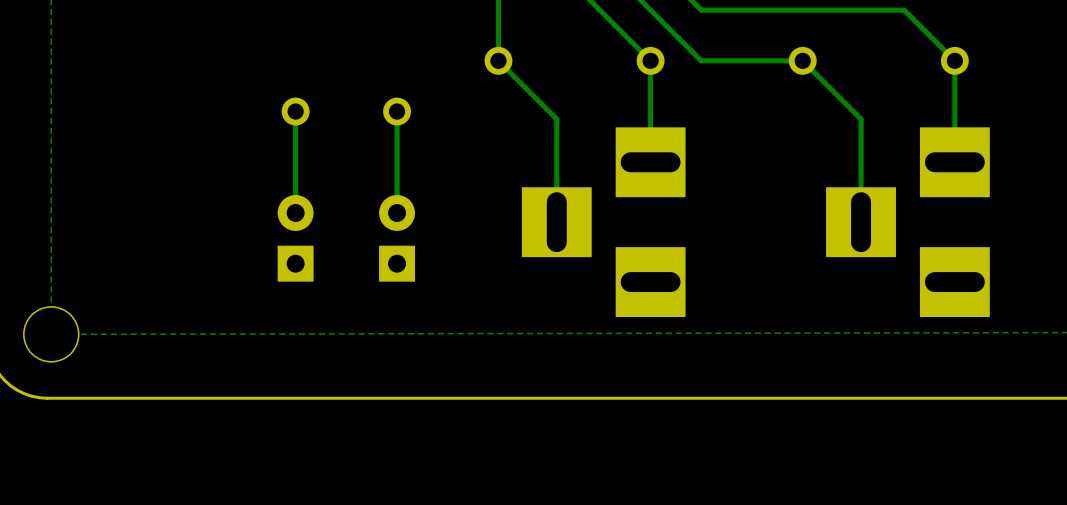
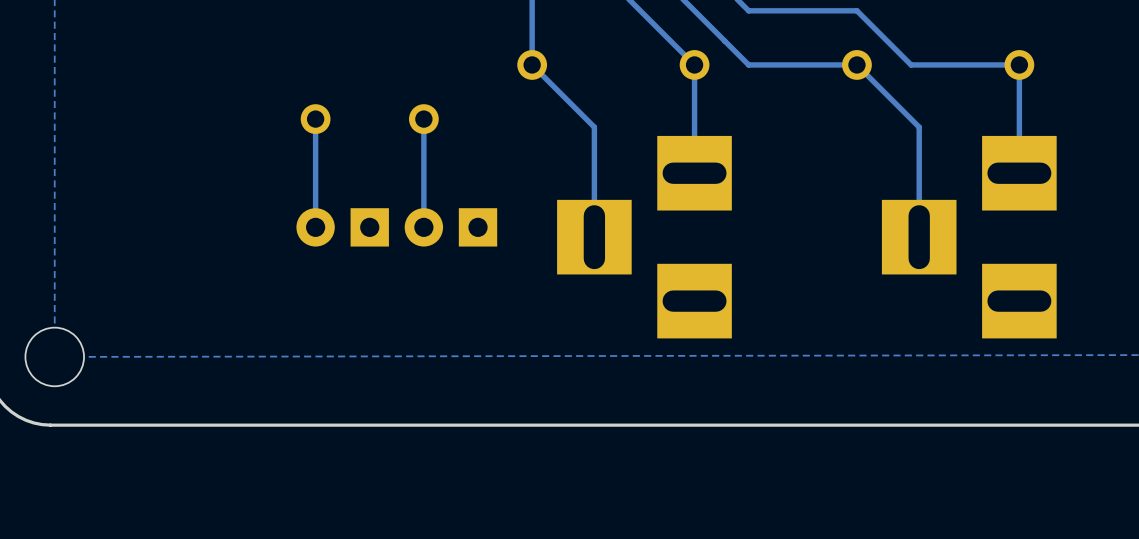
bottom track: (802, 10) (904, 10) (954, 60) -> (856, 10) (911, 64) (1019, 64)
part rotation: 0° (295, 238) -> 90° counterclockwise (342, 227)
part rotation: 0° (397, 238) -> 90° counterclockwise (450, 227)

